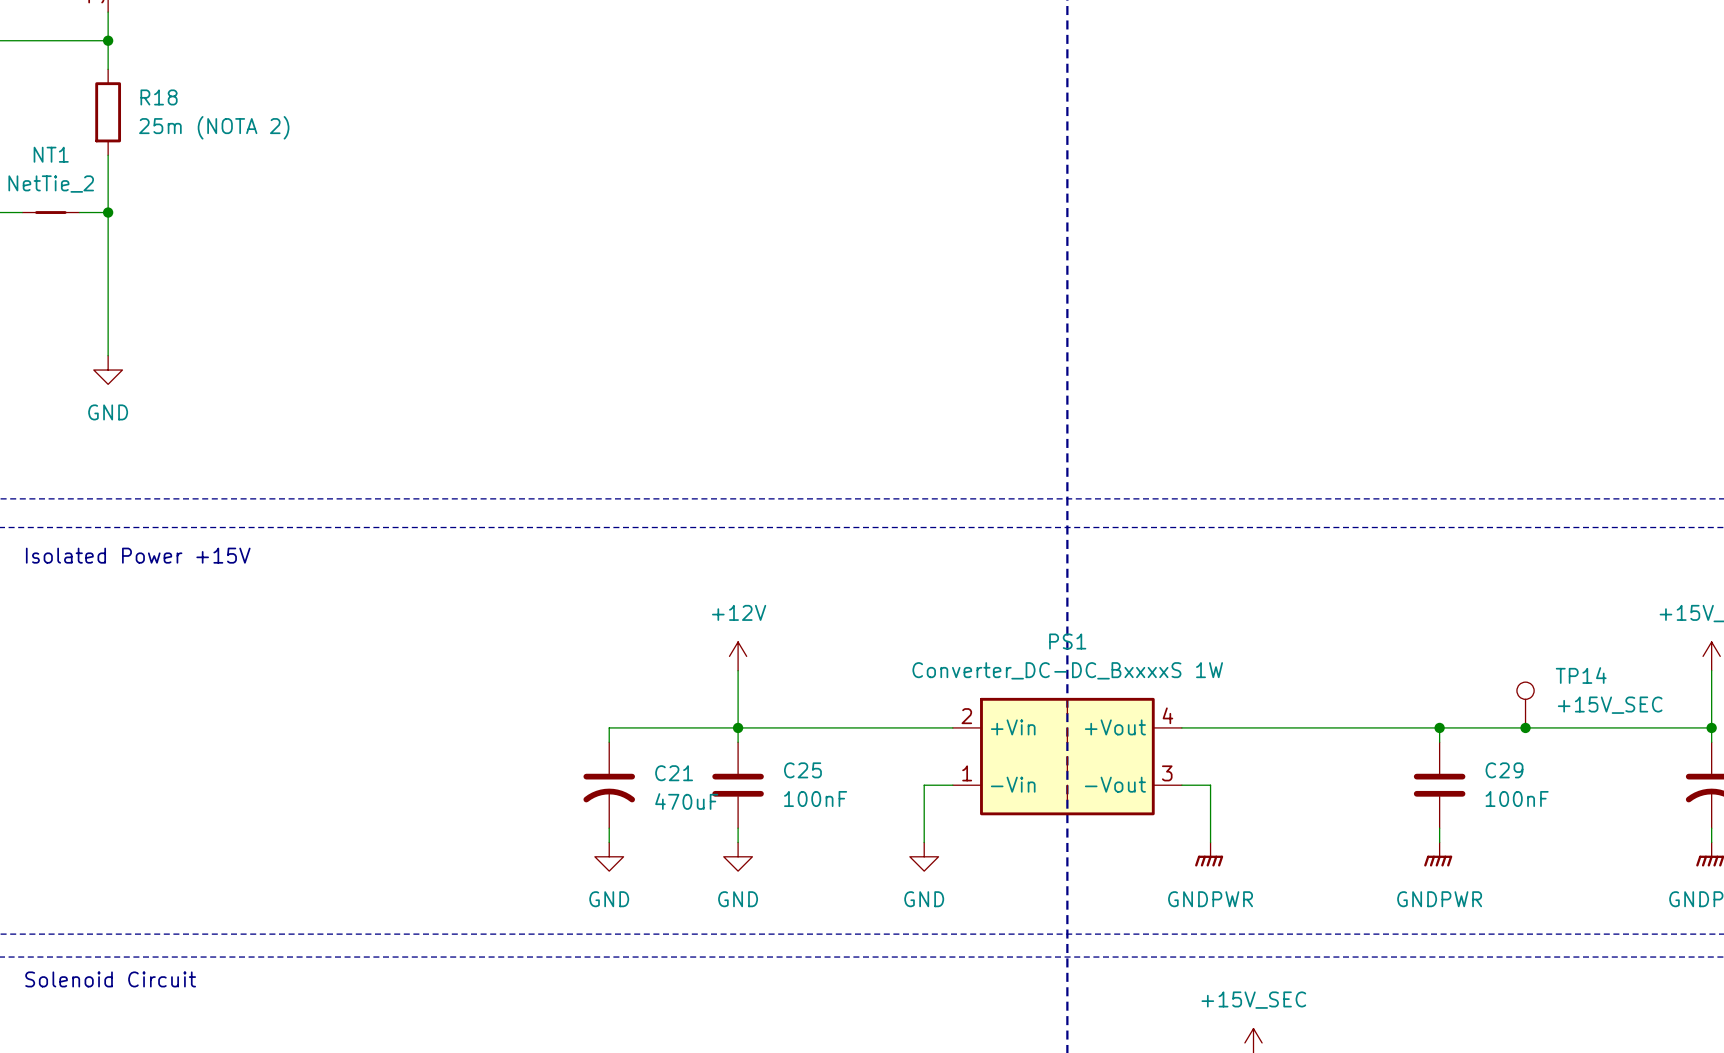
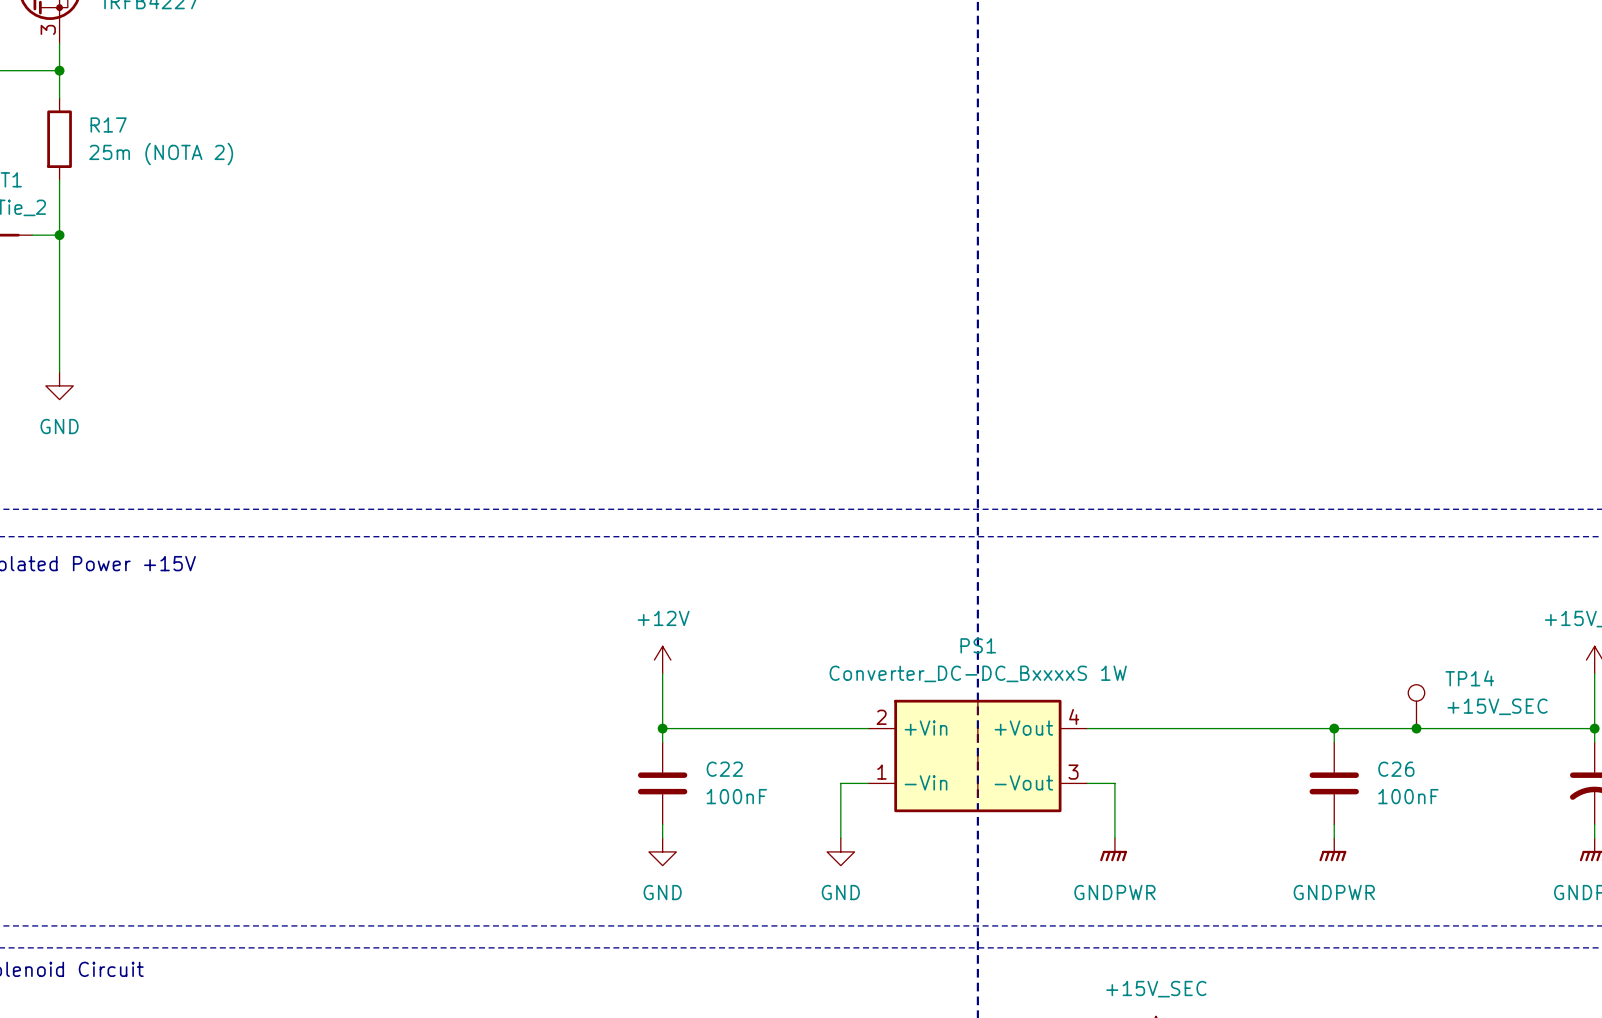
R18 name: R18 (159, 97) -> R17 (108, 124)
wire: (738, 727) (609, 727) (609, 742) -> none
C25 name: C25 (802, 770) -> C22 (724, 769)
C29 name: C29 (1504, 770) -> C26 (1396, 769)
C21: 470uF (609, 785) -> none
wire: (609, 828) (609, 842) -> none
power symbol: GND (609, 856) -> none

